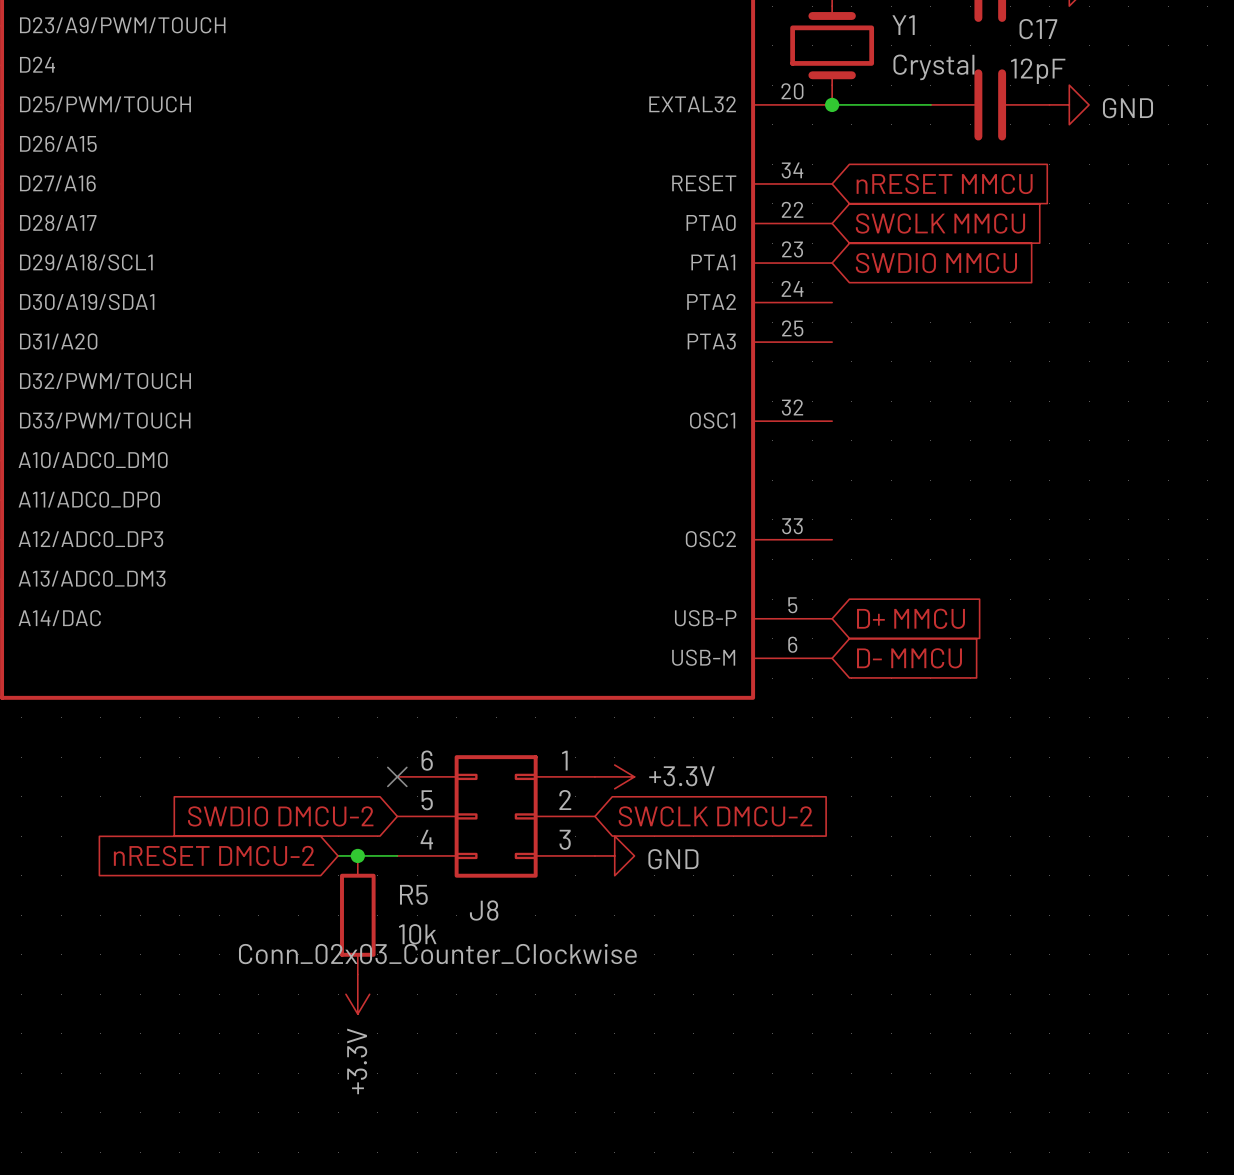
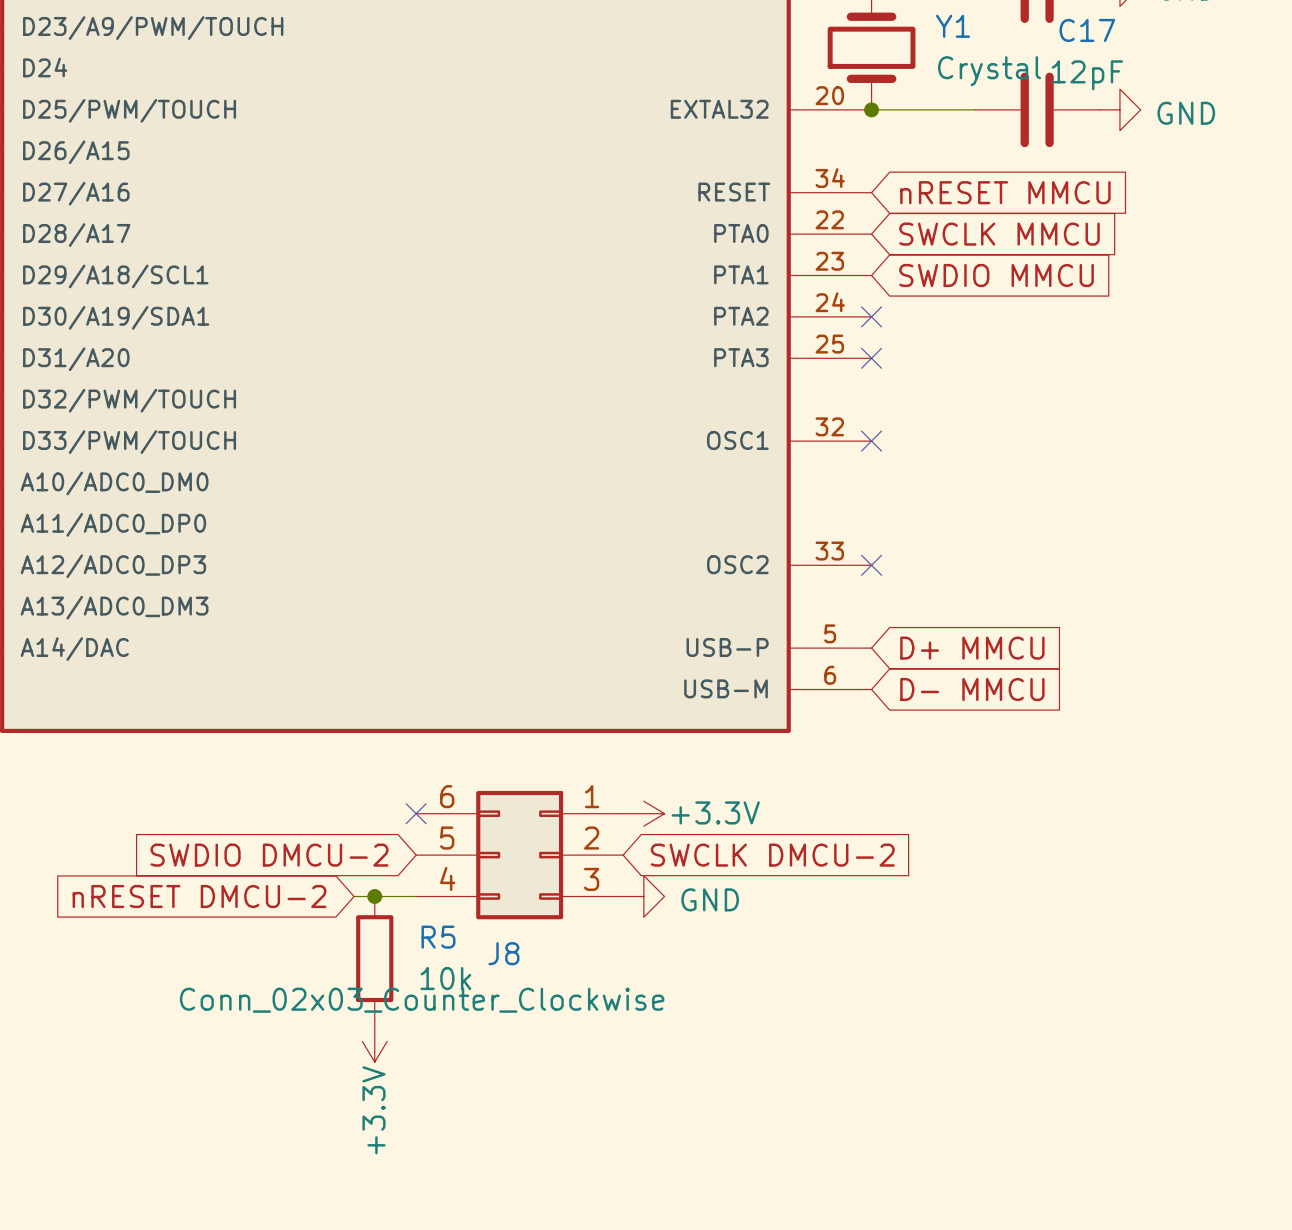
no-connect mark: none -> (871, 316)
no-connect mark: none -> (871, 358)
no-connect mark: none -> (871, 441)
no-connect mark: none -> (871, 565)

